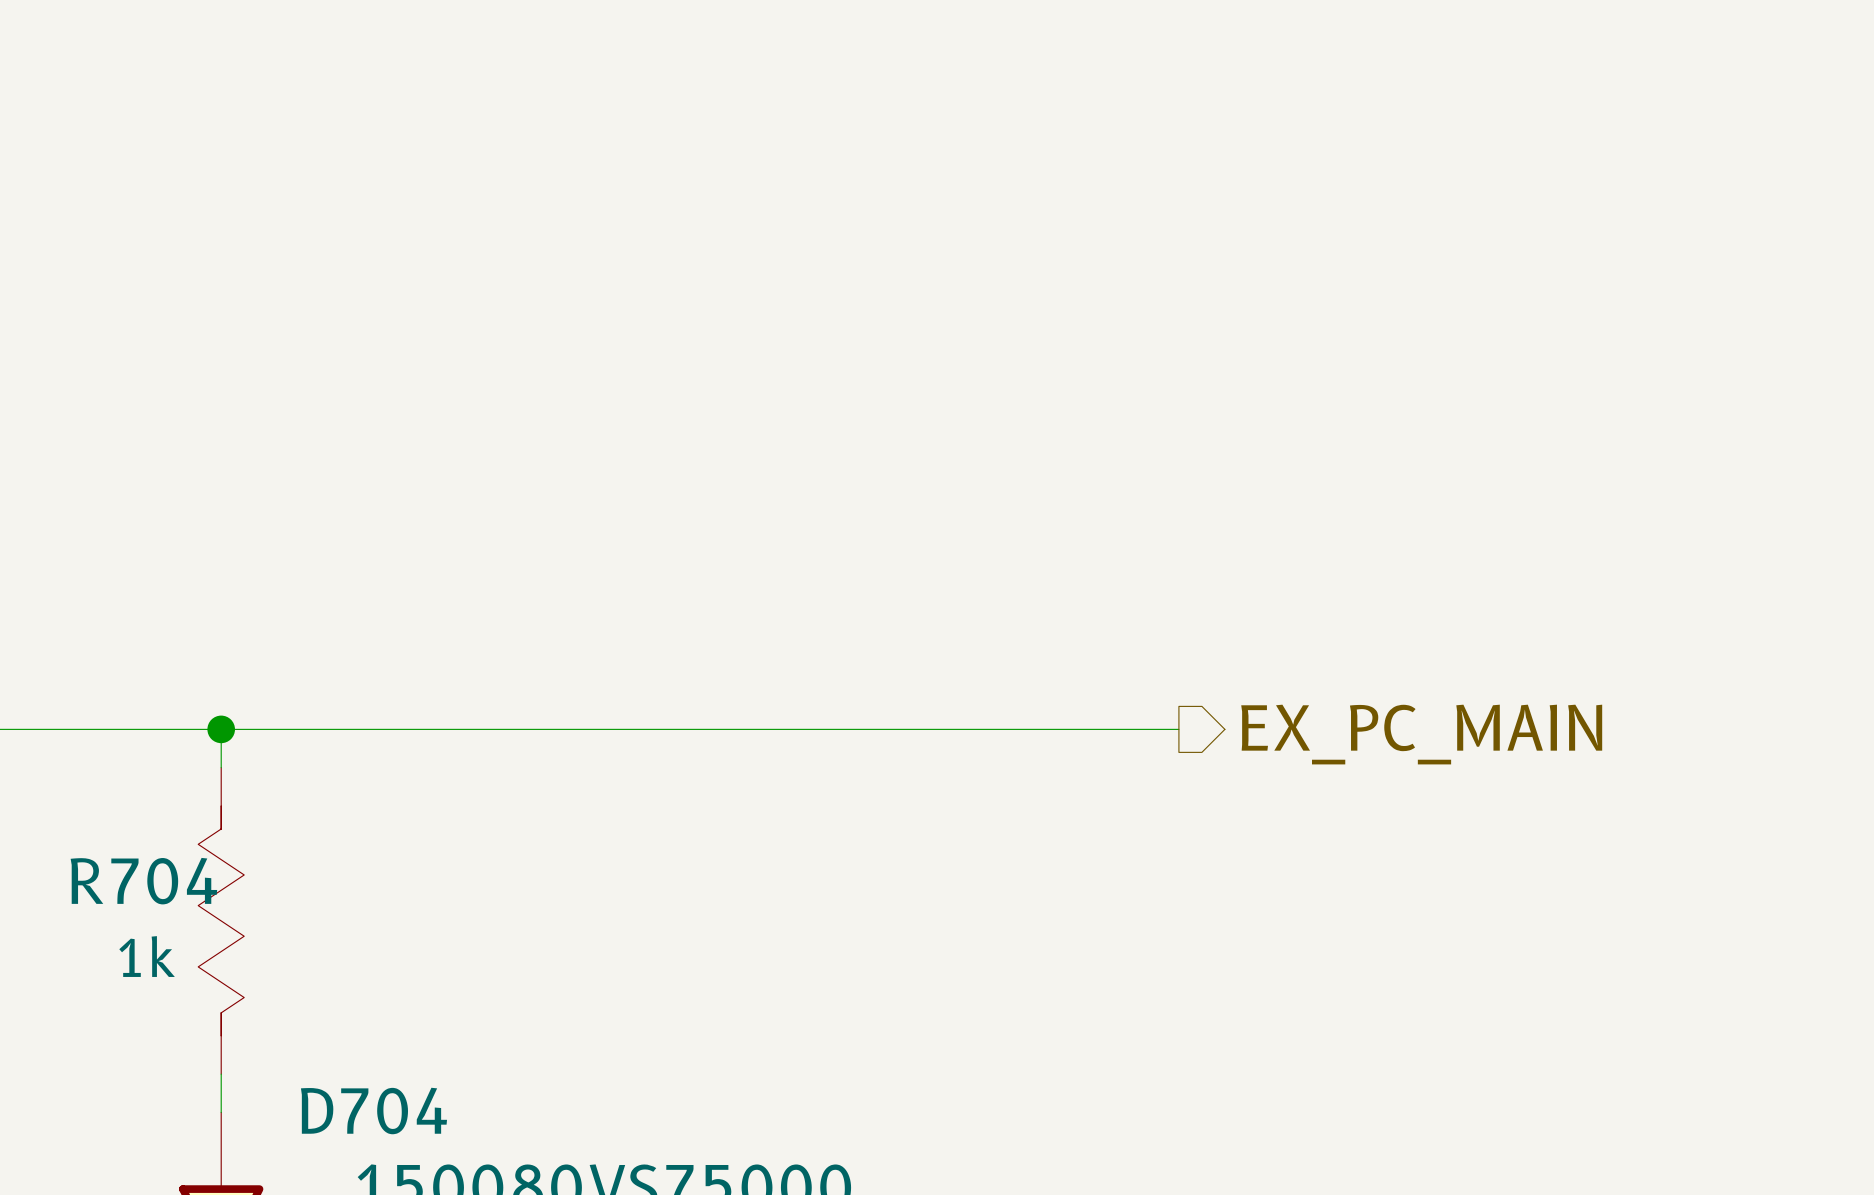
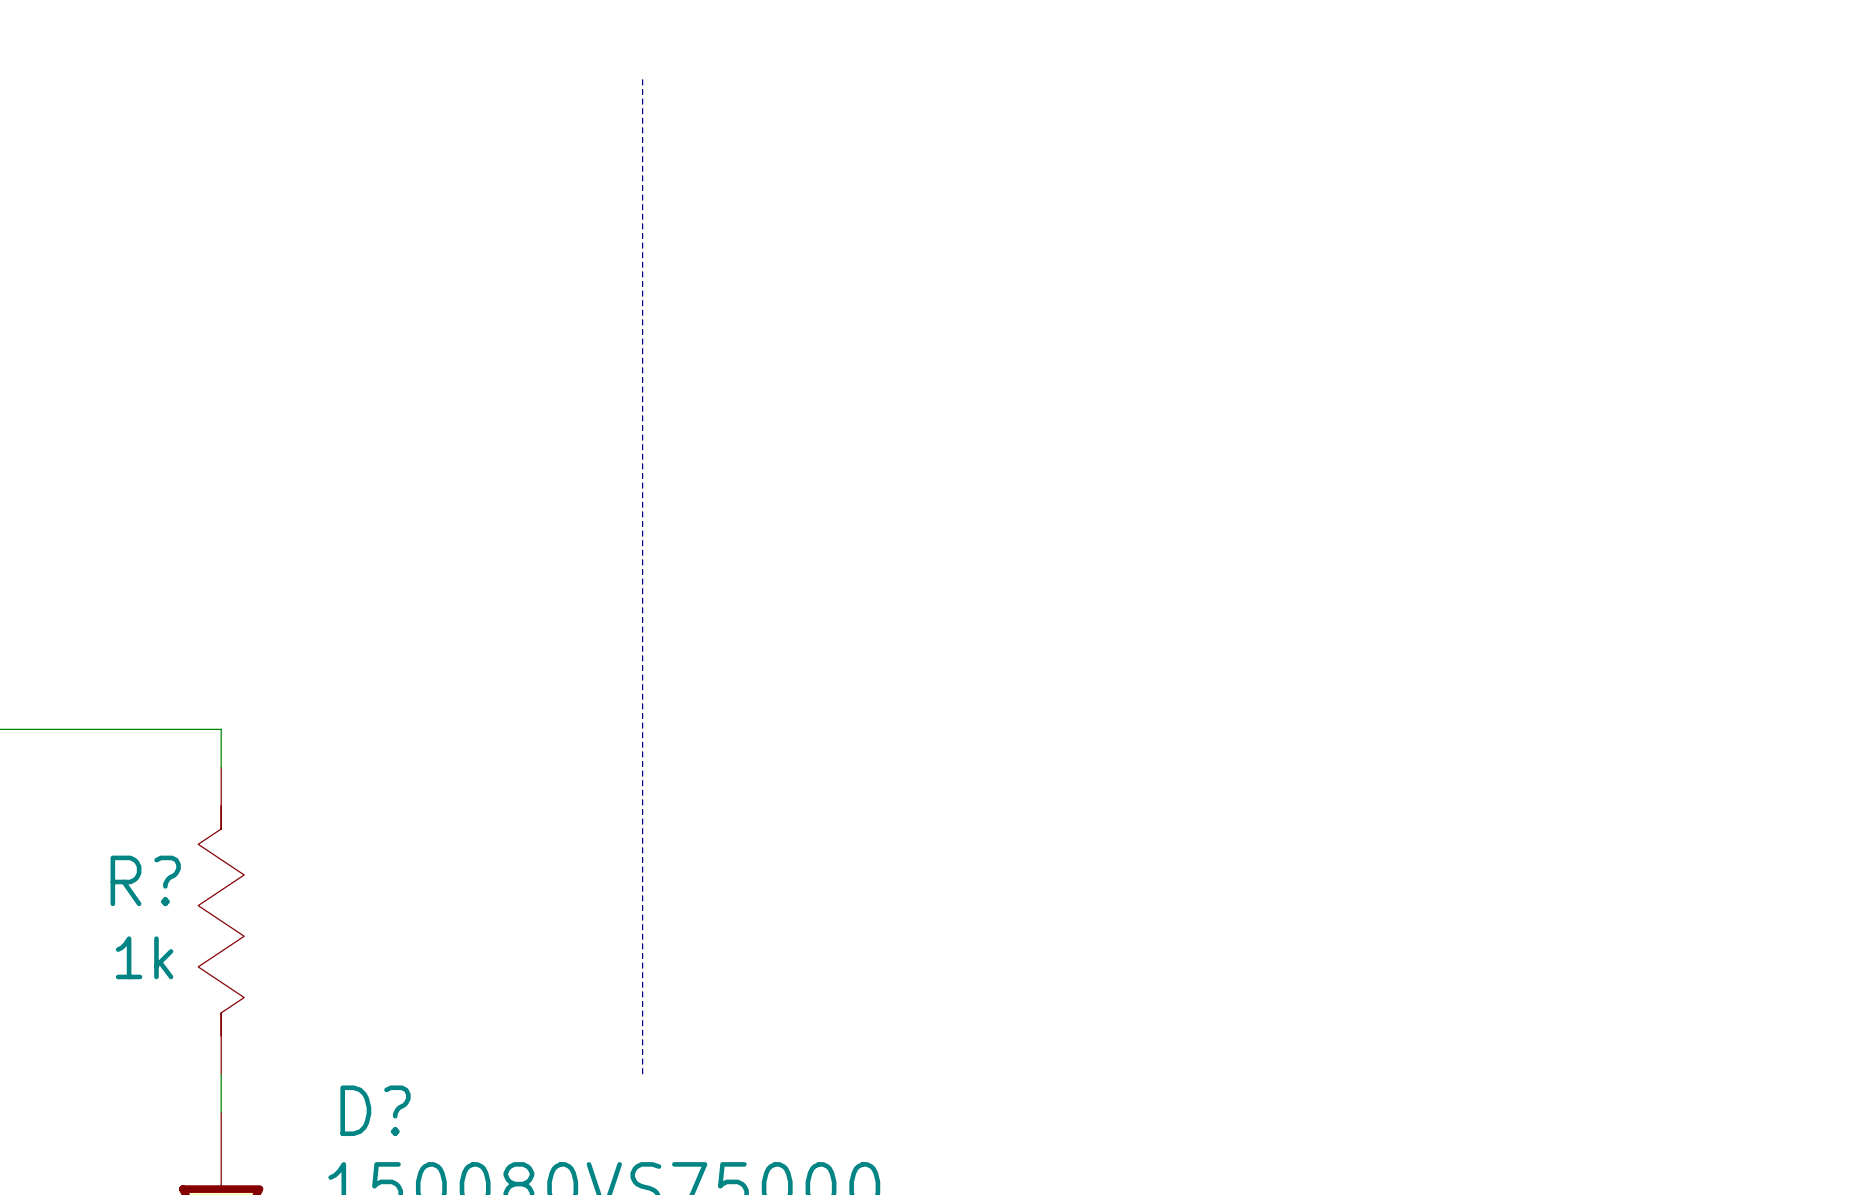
line: none -> (642, 78) (642, 1074)
wire: (221, 729) (1178, 729) -> none
junction: (221, 729) -> none
hierarchical label: EX_PC_MAIN (1421, 734) -> none
R704 name: R704 (143, 881) -> R? (145, 880)
D704 name: D704 (373, 1111) -> D? (375, 1110)

